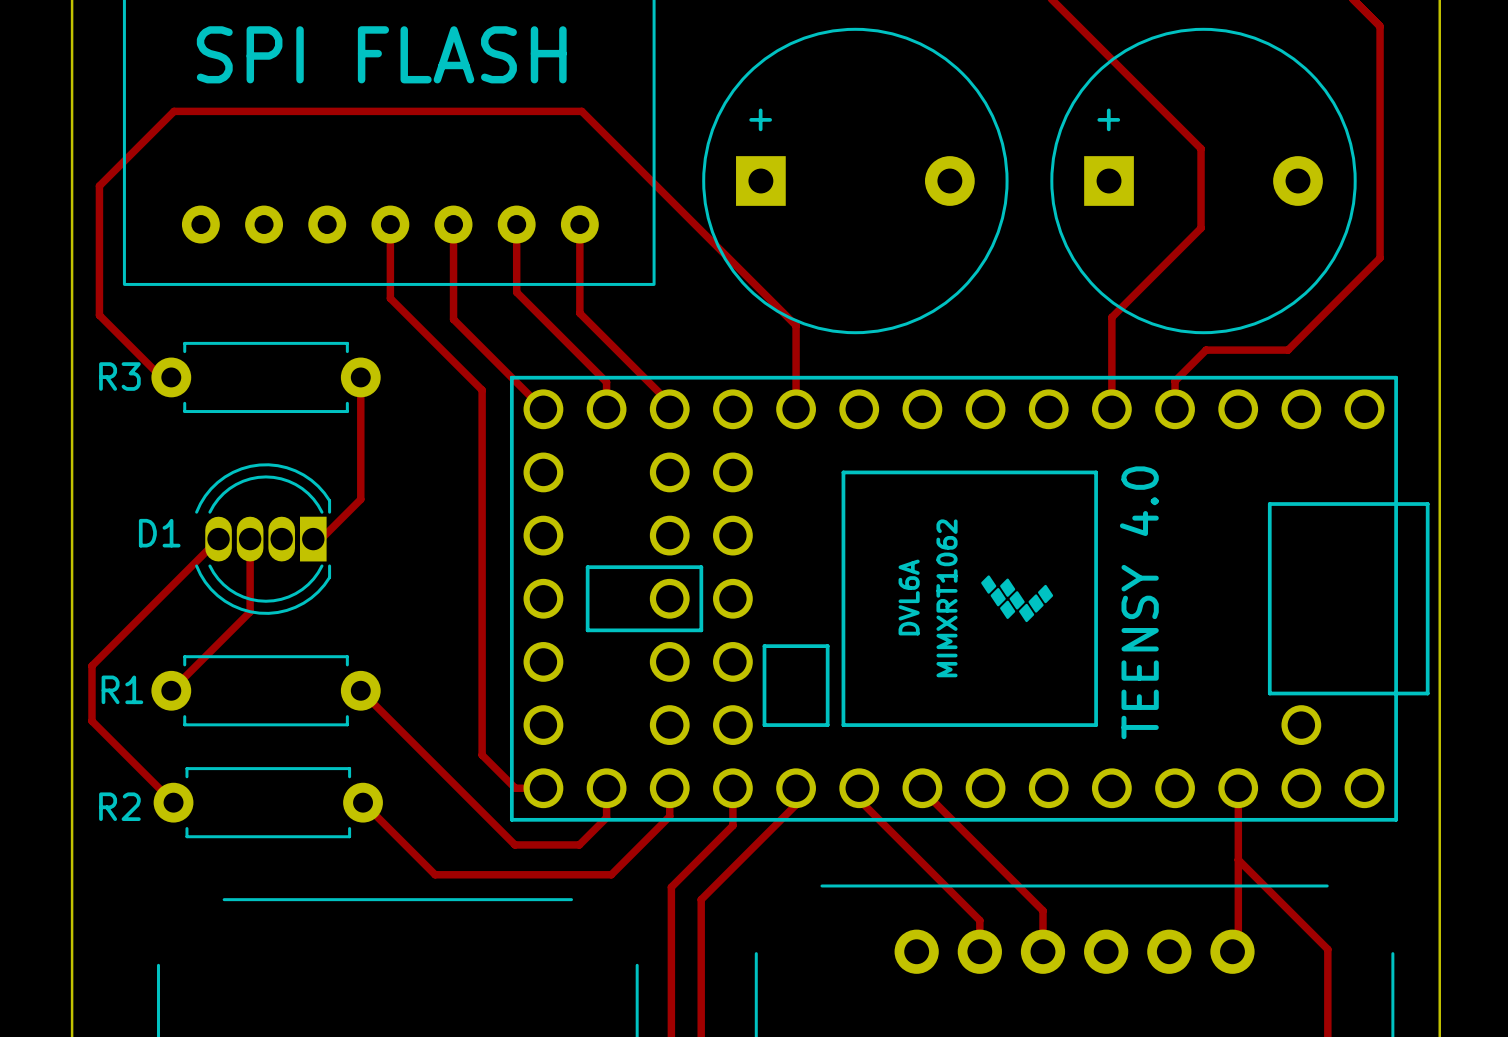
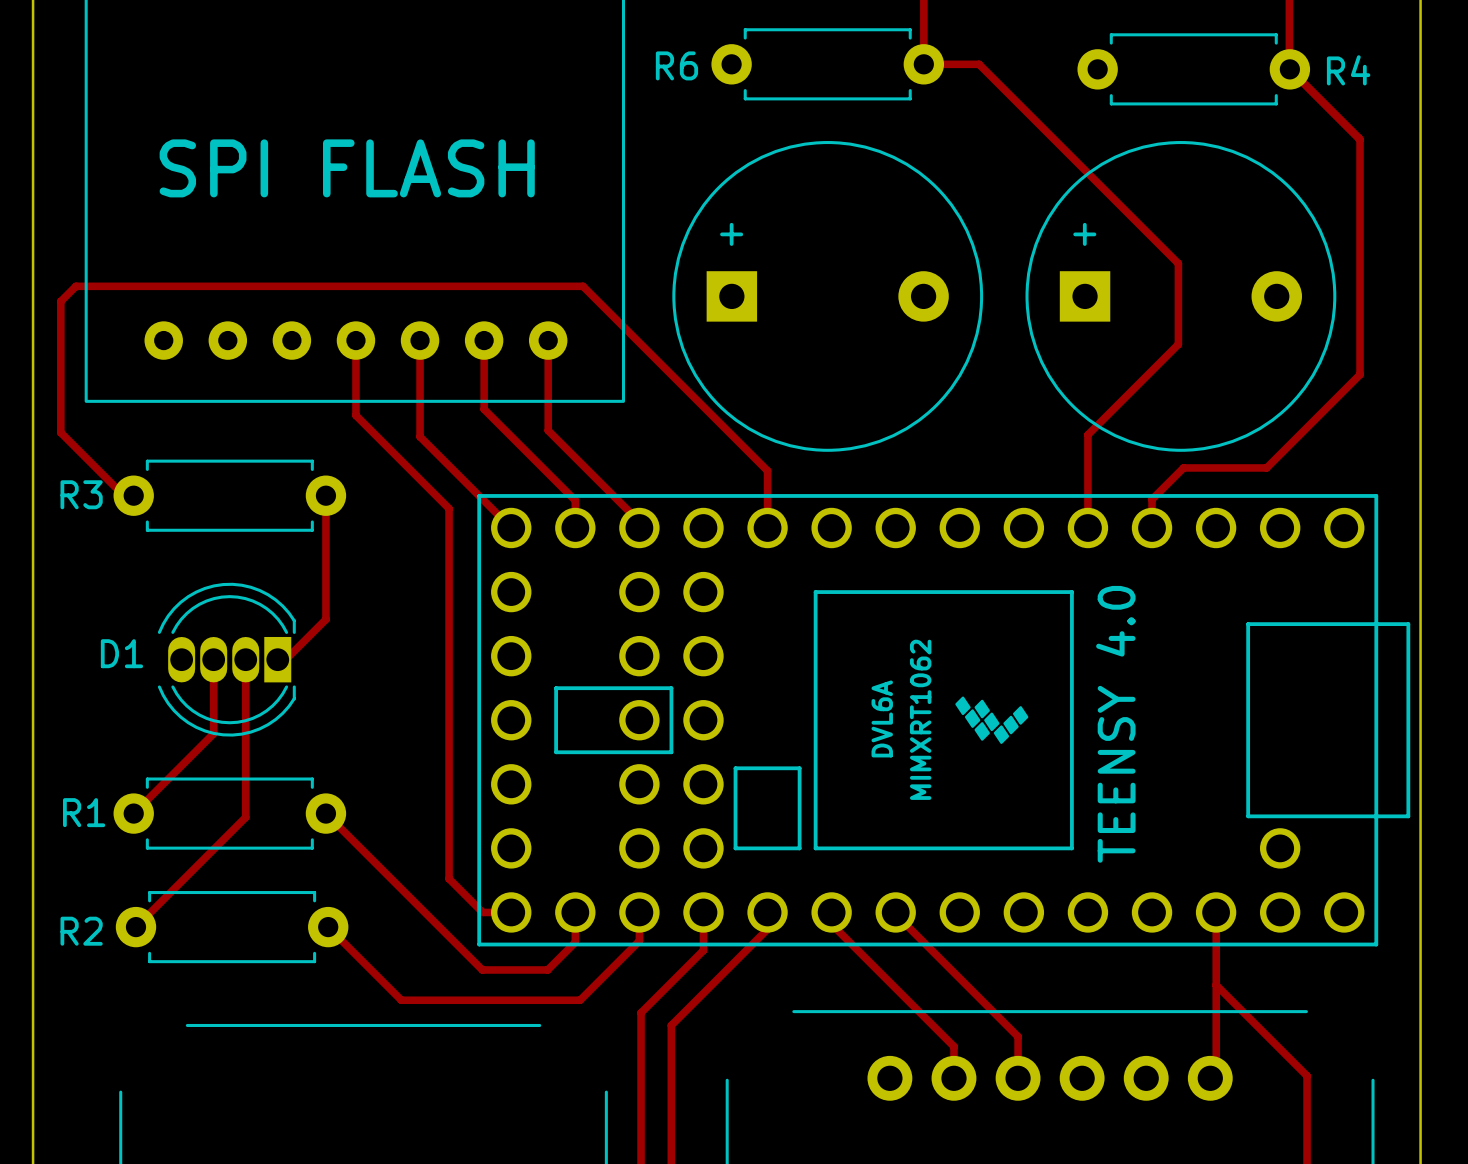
track: (114, 171) (174, 111) (581, 111) (796, 325) (796, 352) -> (75, 286) (583, 286) (767, 470)
track: (218, 539) (91, 665) (91, 721) (173, 802) -> (245, 659) (245, 817) (135, 927)

